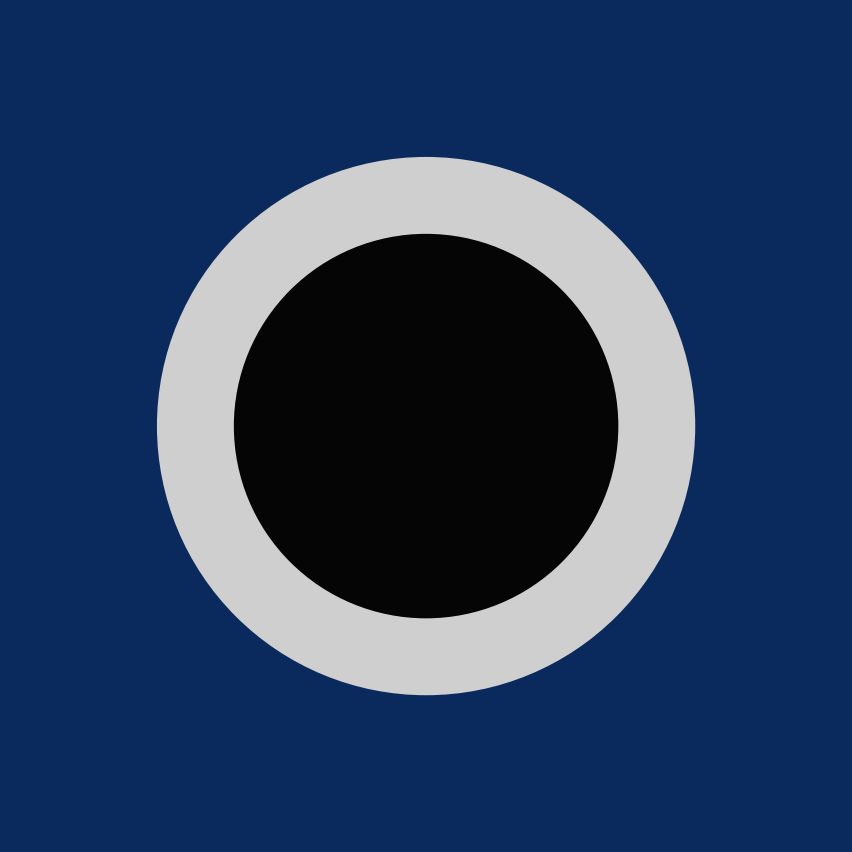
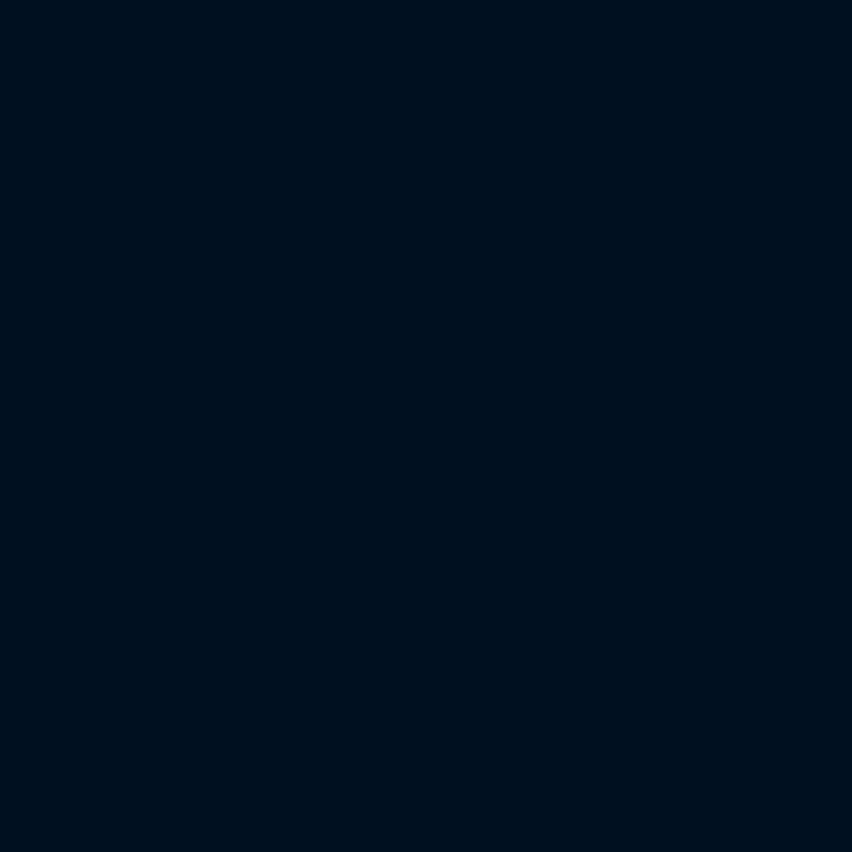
part: (426, 426) -> none

